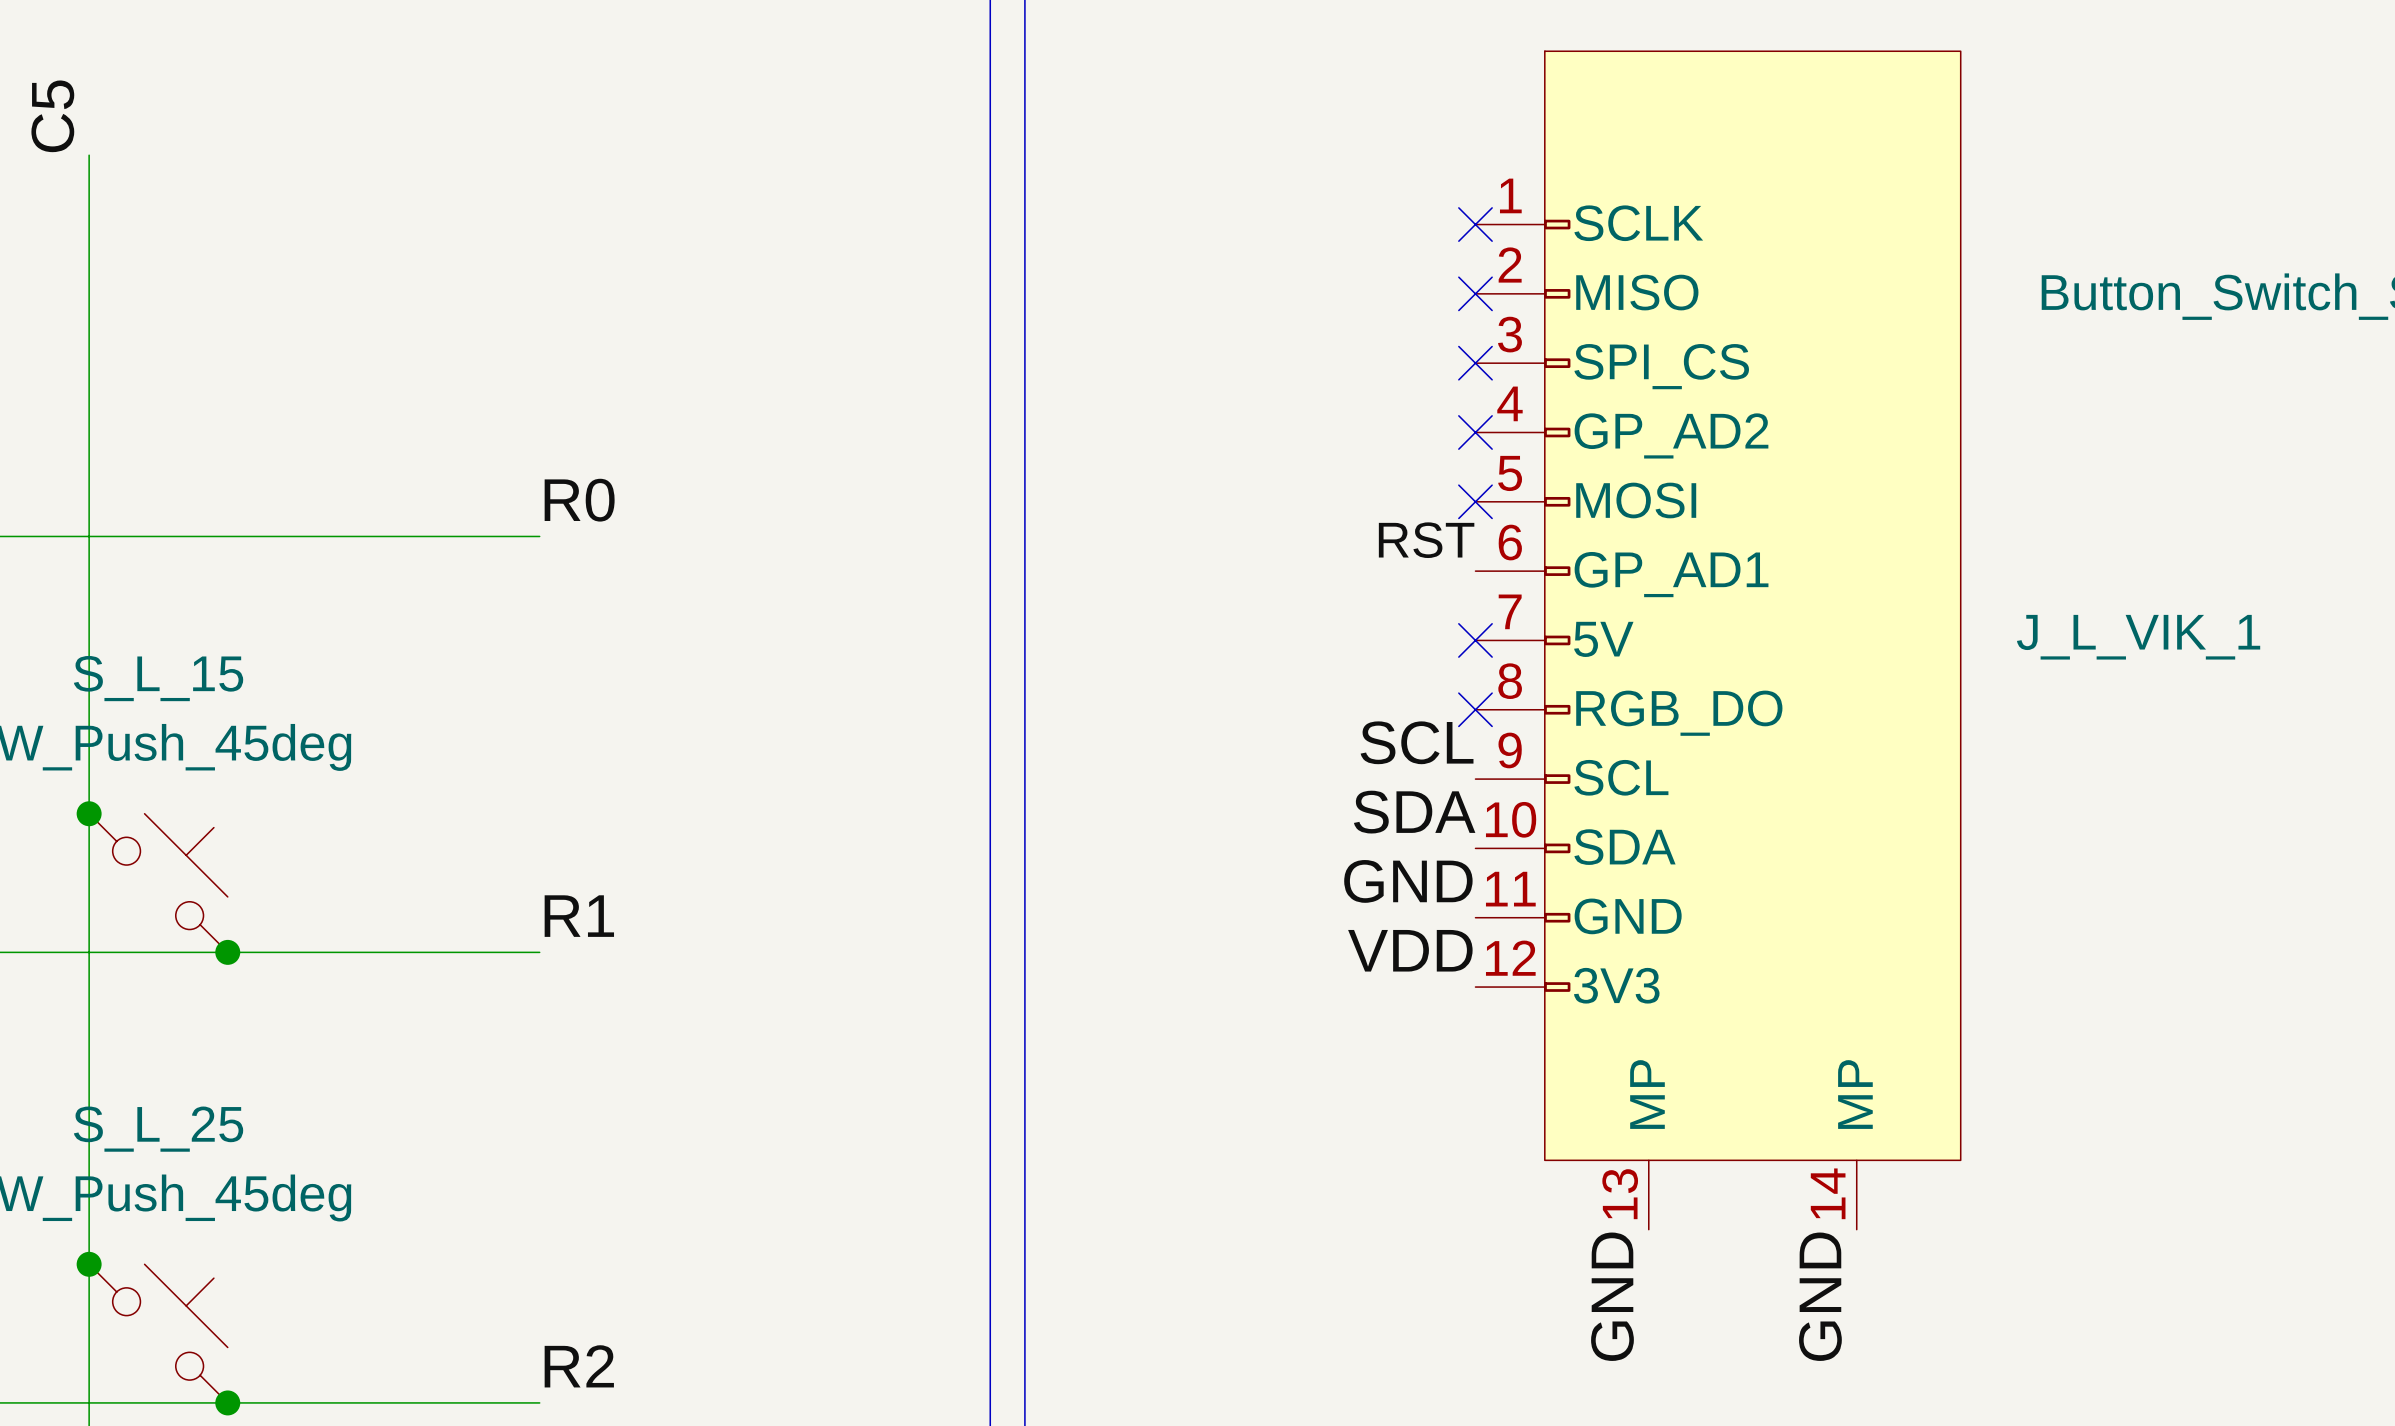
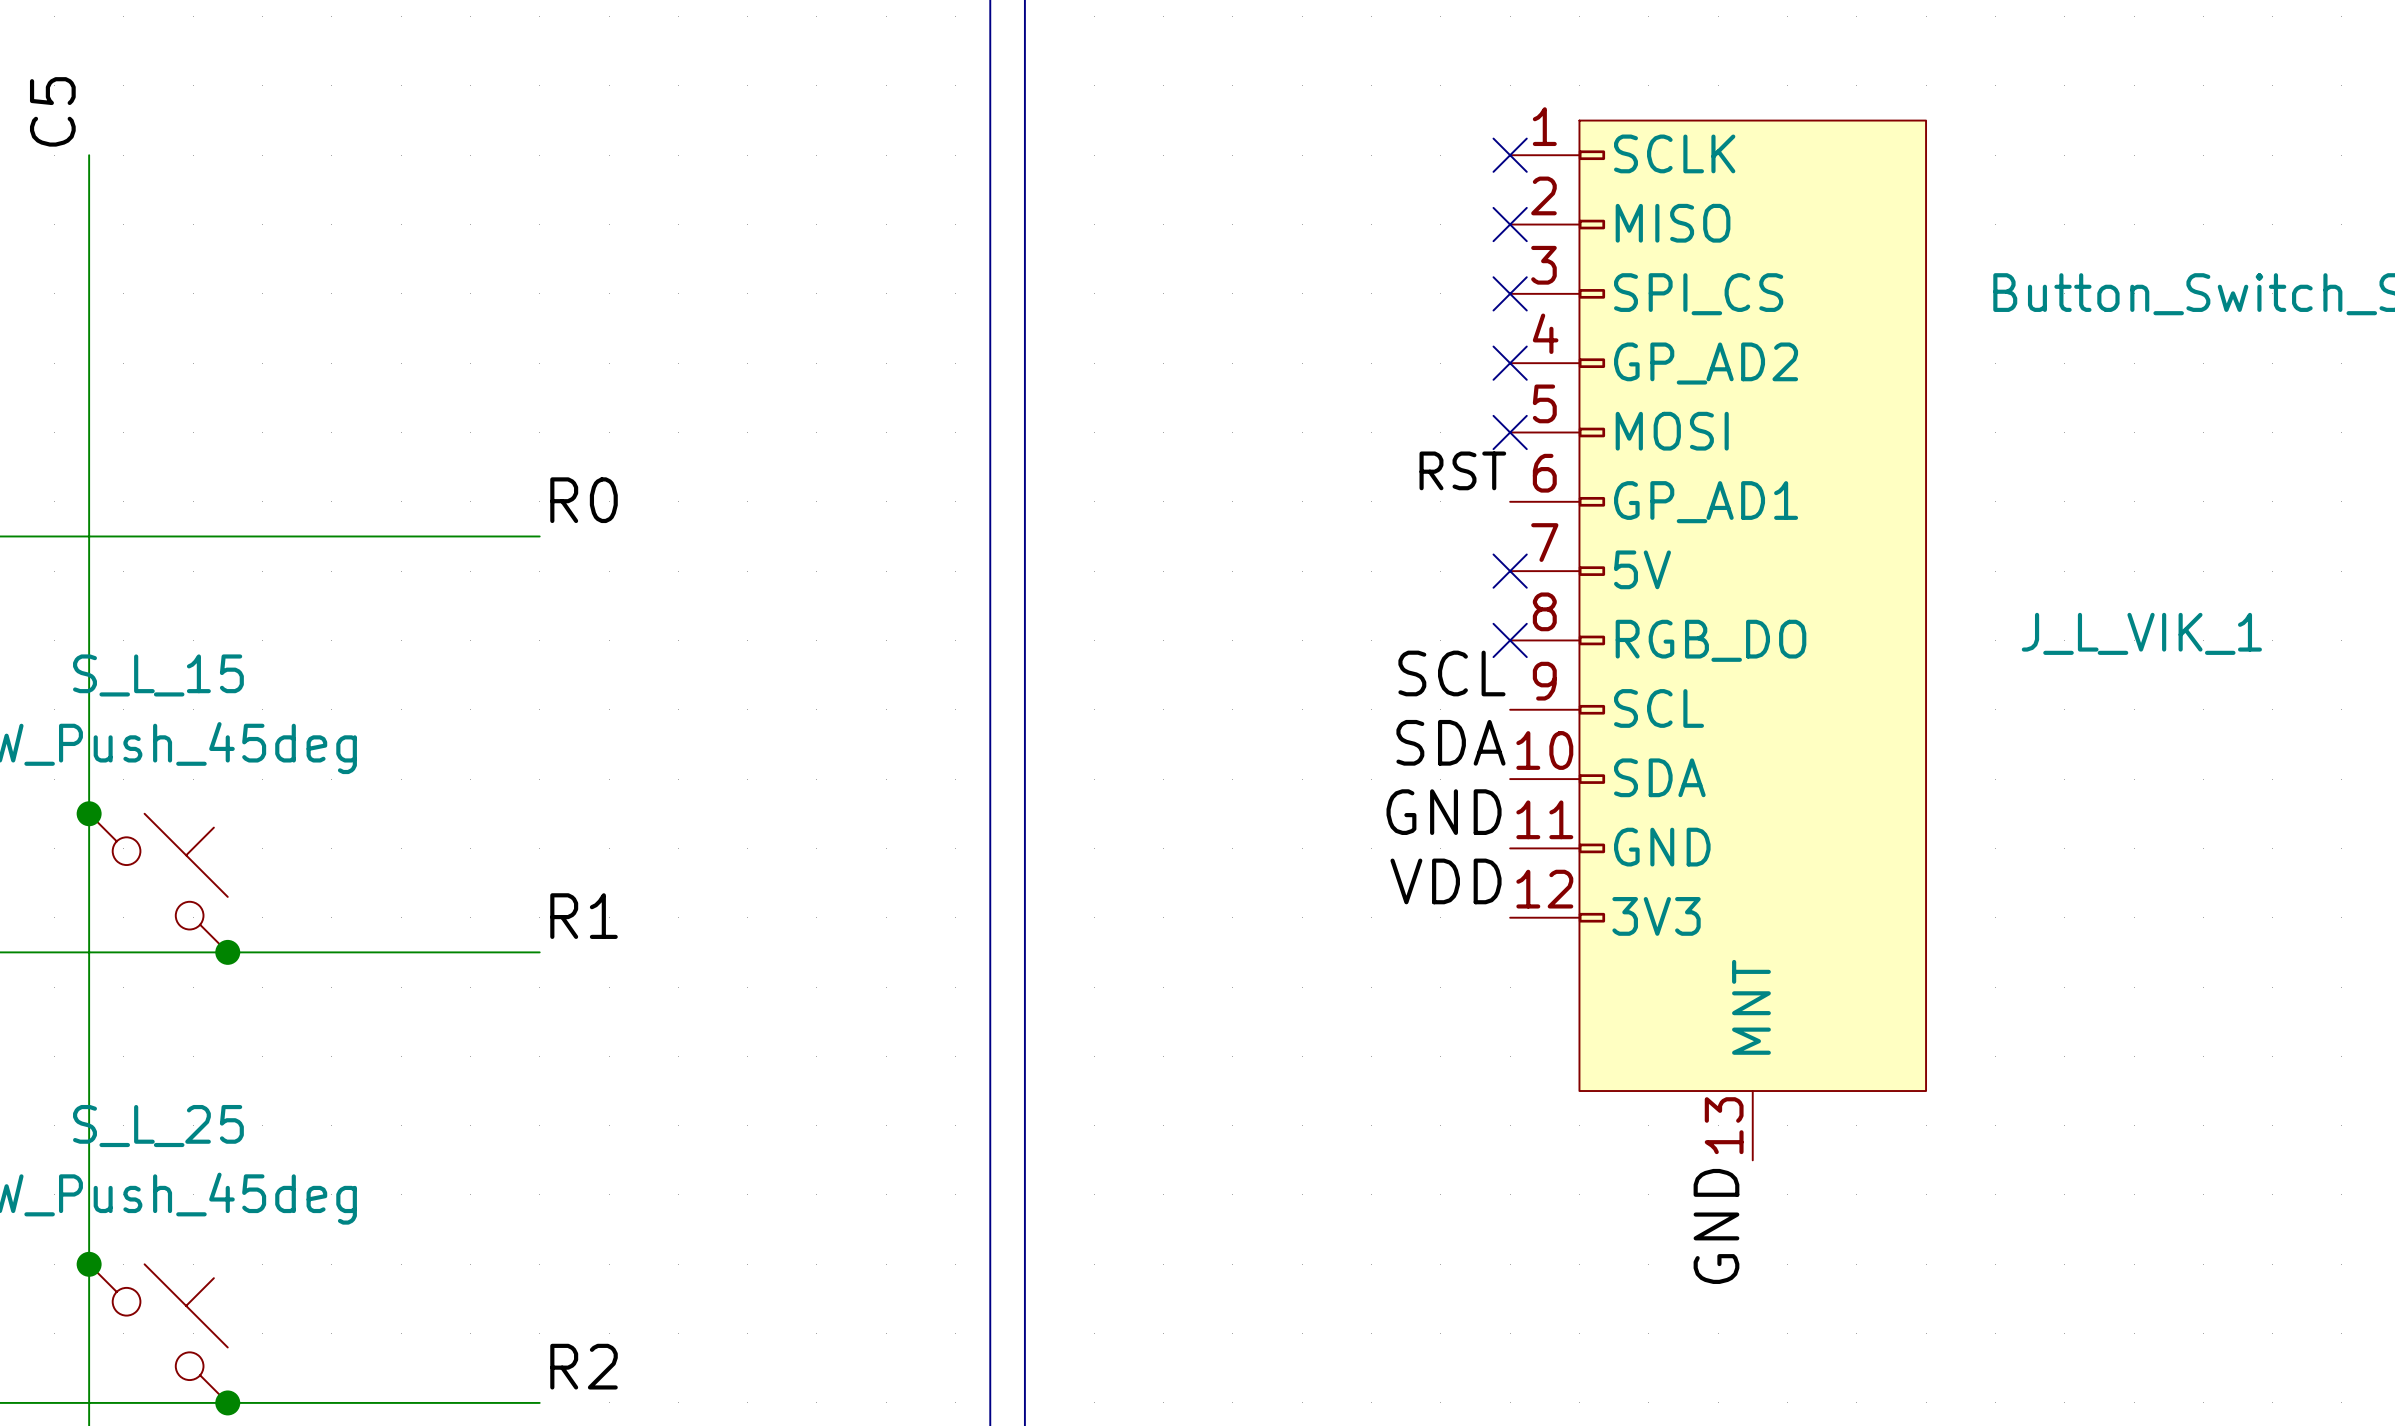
J_L_VIK_1 symbol: [1475, 51, 1961, 1230] -> [1510, 120, 1927, 1161]
no-connect mark: none -> (1510, 155)
no-connect mark position: (1475, 224) -> (1510, 224)
no-connect mark position: (1475, 293) -> (1510, 293)
no-connect mark position: (1475, 363) -> (1510, 363)
no-connect mark position: (1475, 432) -> (1510, 432)
no-connect mark: (1475, 501) -> none
label position: RST (1426, 540) -> RST (1462, 470)
no-connect mark: none -> (1510, 571)
no-connect mark position: (1475, 640) -> (1510, 640)
no-connect mark: (1475, 709) -> none
label position: SCL (1417, 742) -> SCL (1451, 673)
label position: SDA (1414, 812) -> SDA (1450, 742)
label position: GND (1408, 881) -> GND (1444, 812)
label position: VDD (1410, 950) -> VDD (1446, 881)
label: none -> GND (1716, 1226)
label: GND (1612, 1296) -> none
label: GND (1820, 1296) -> none

